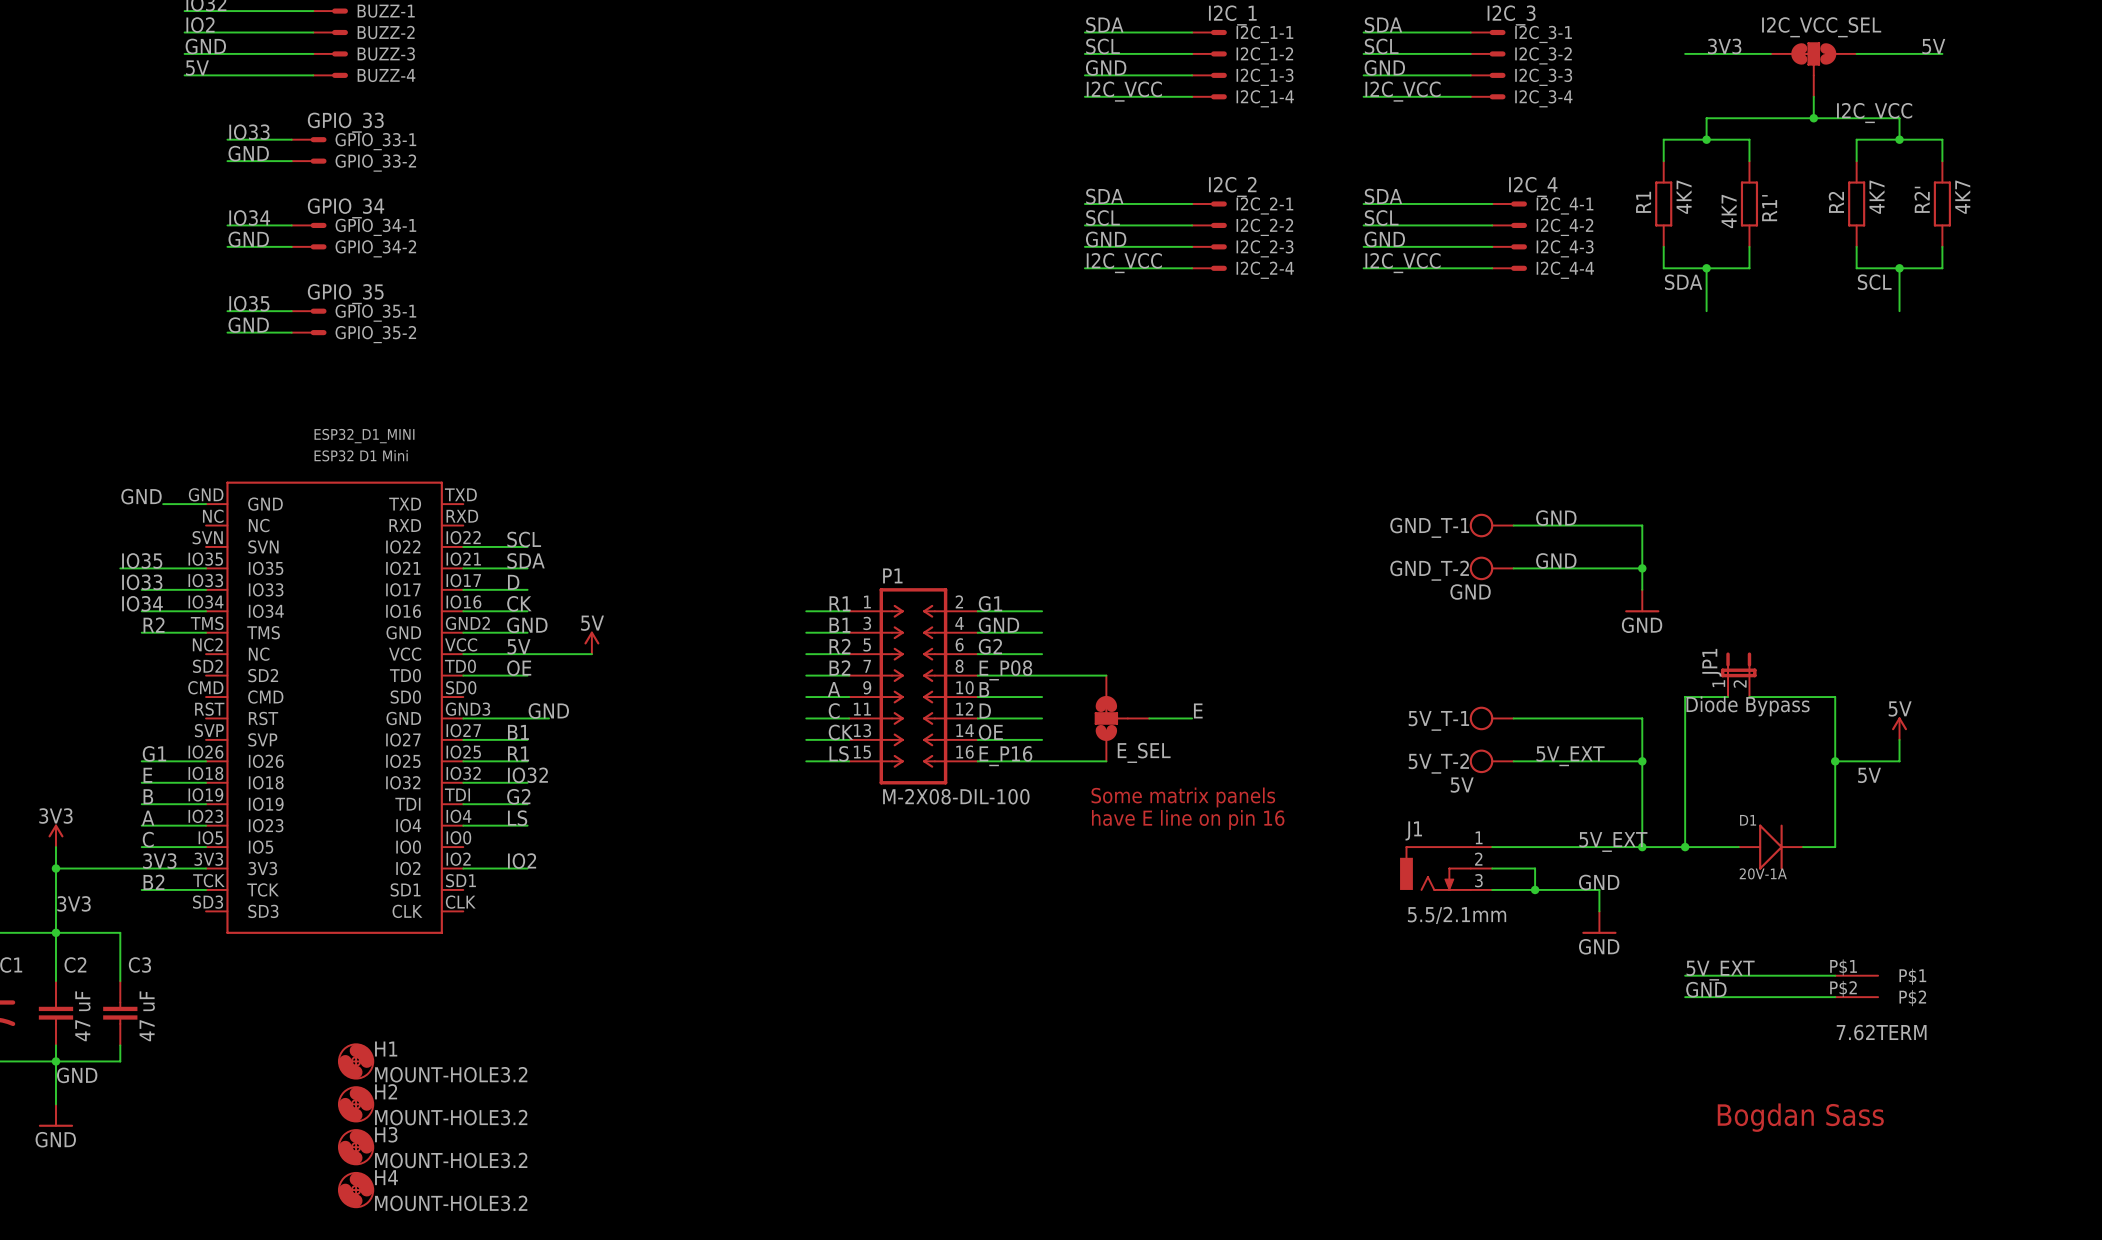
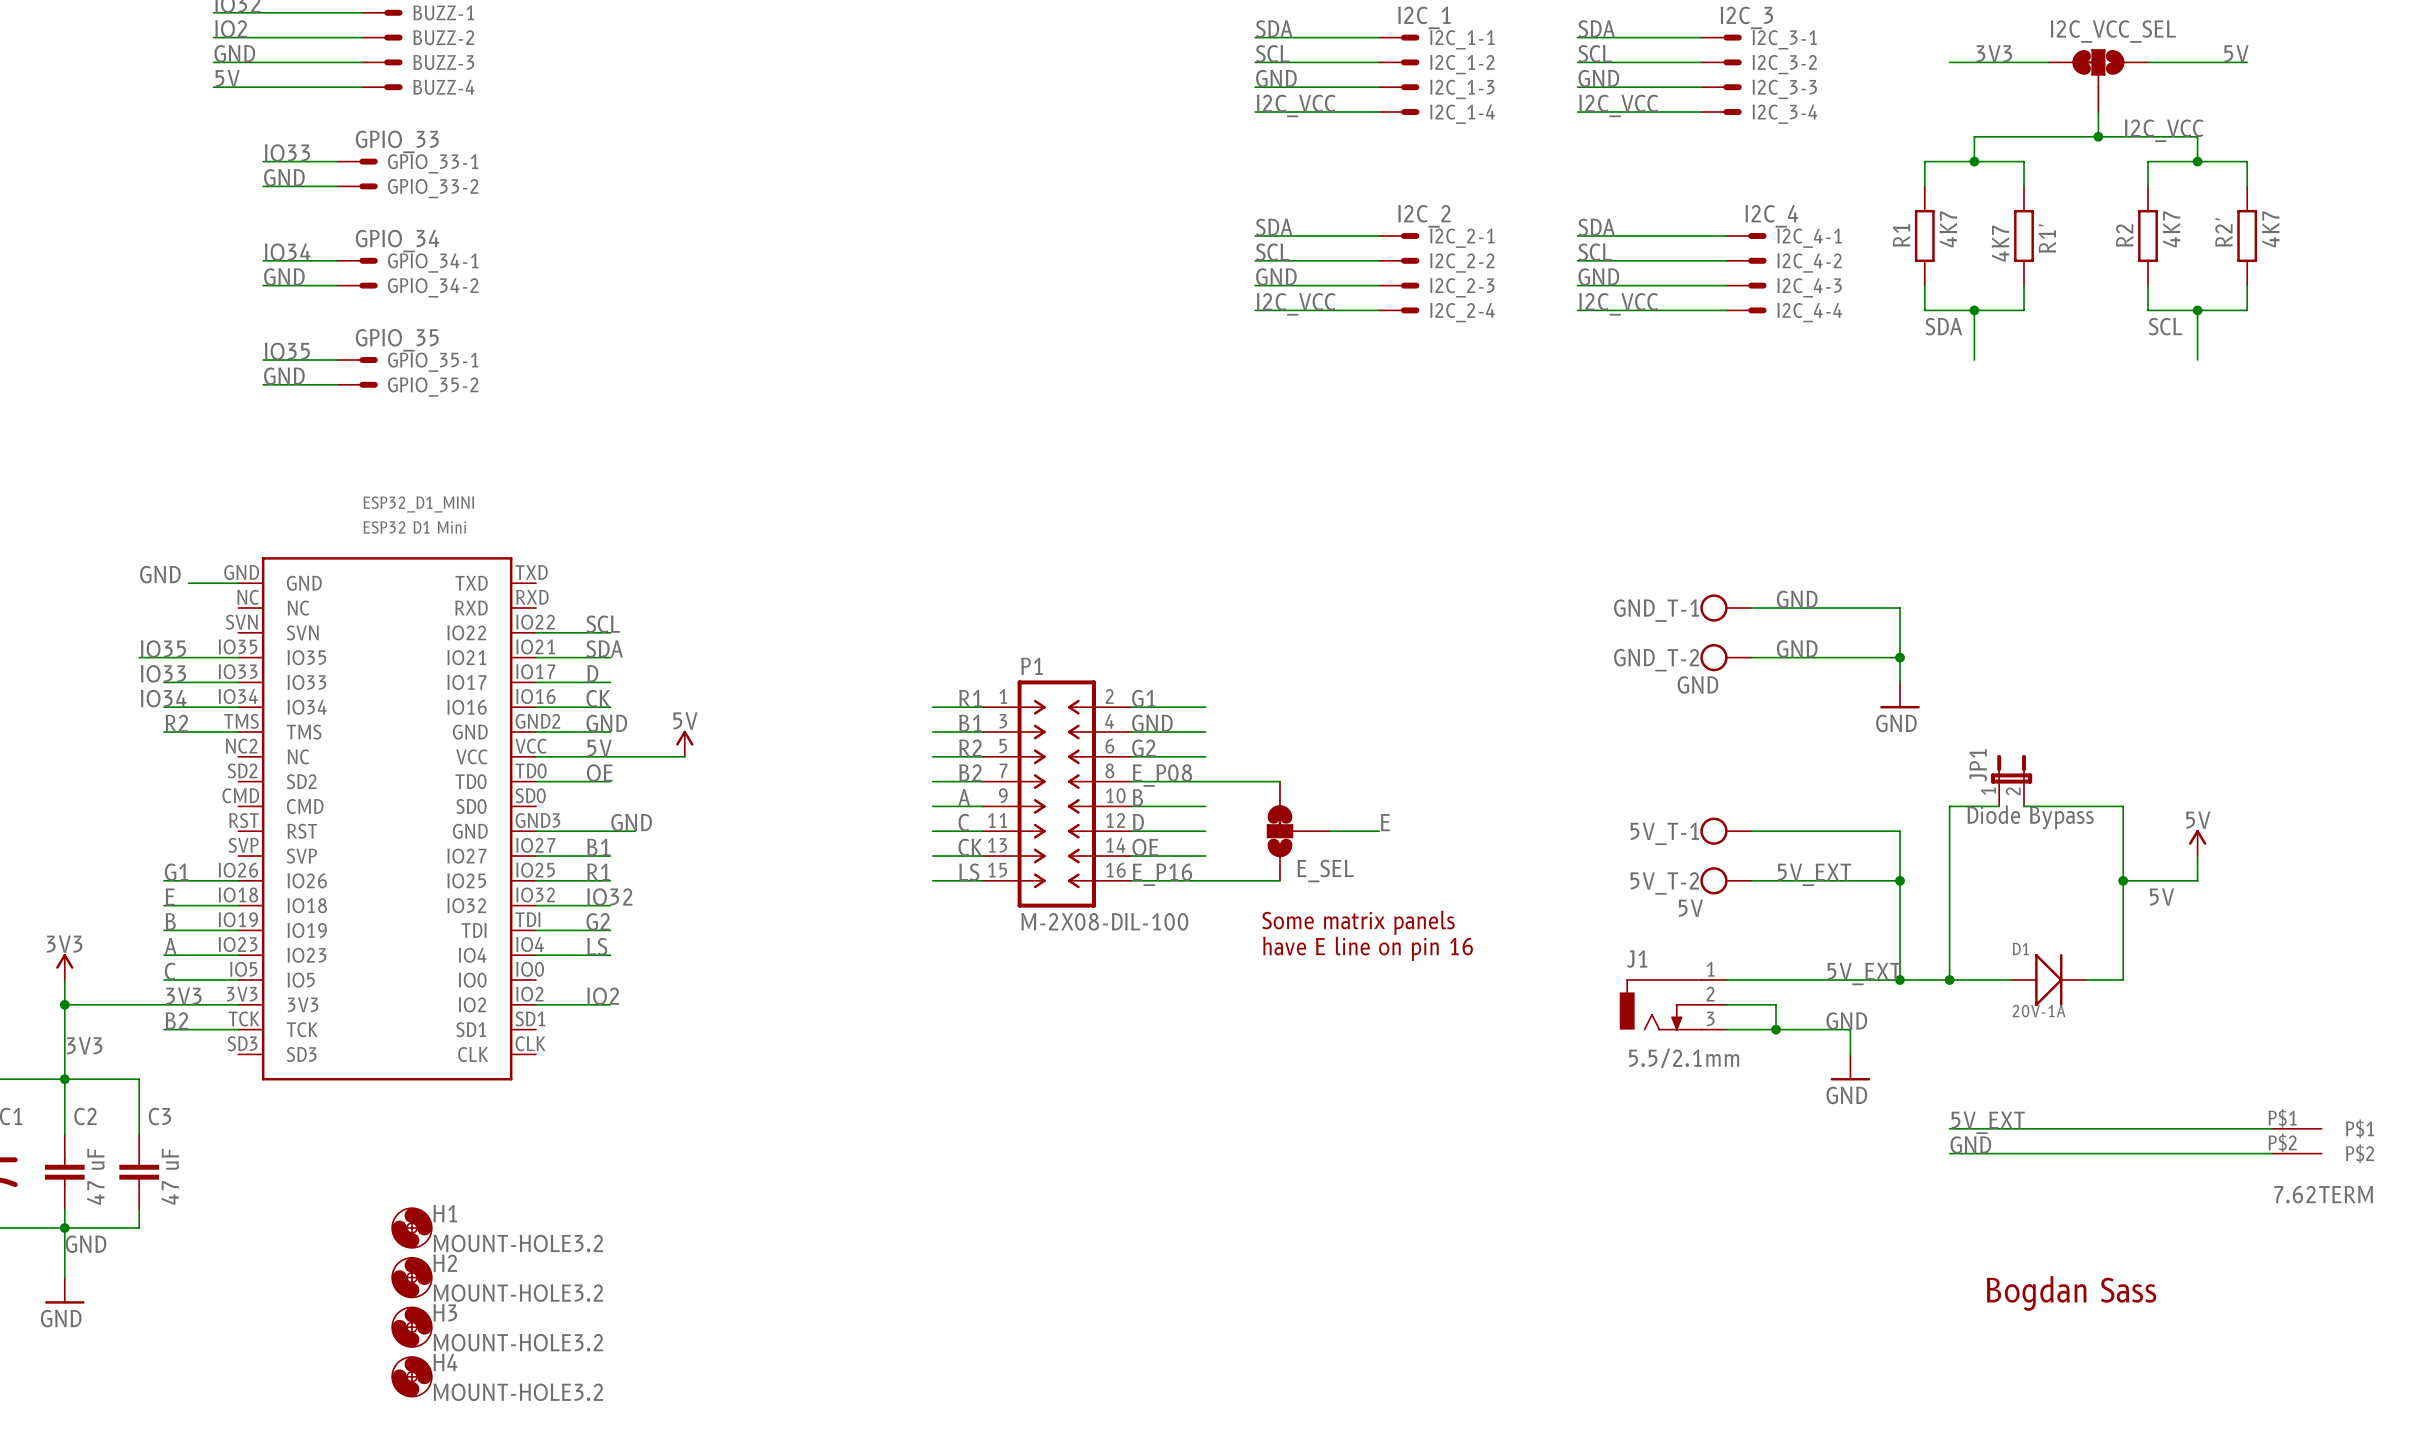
wire: none -> (2123, 1128) (2272, 1128)
part position: (1856, 986) -> (2296, 1141)
wire: none -> (2123, 1153) (2272, 1153)

